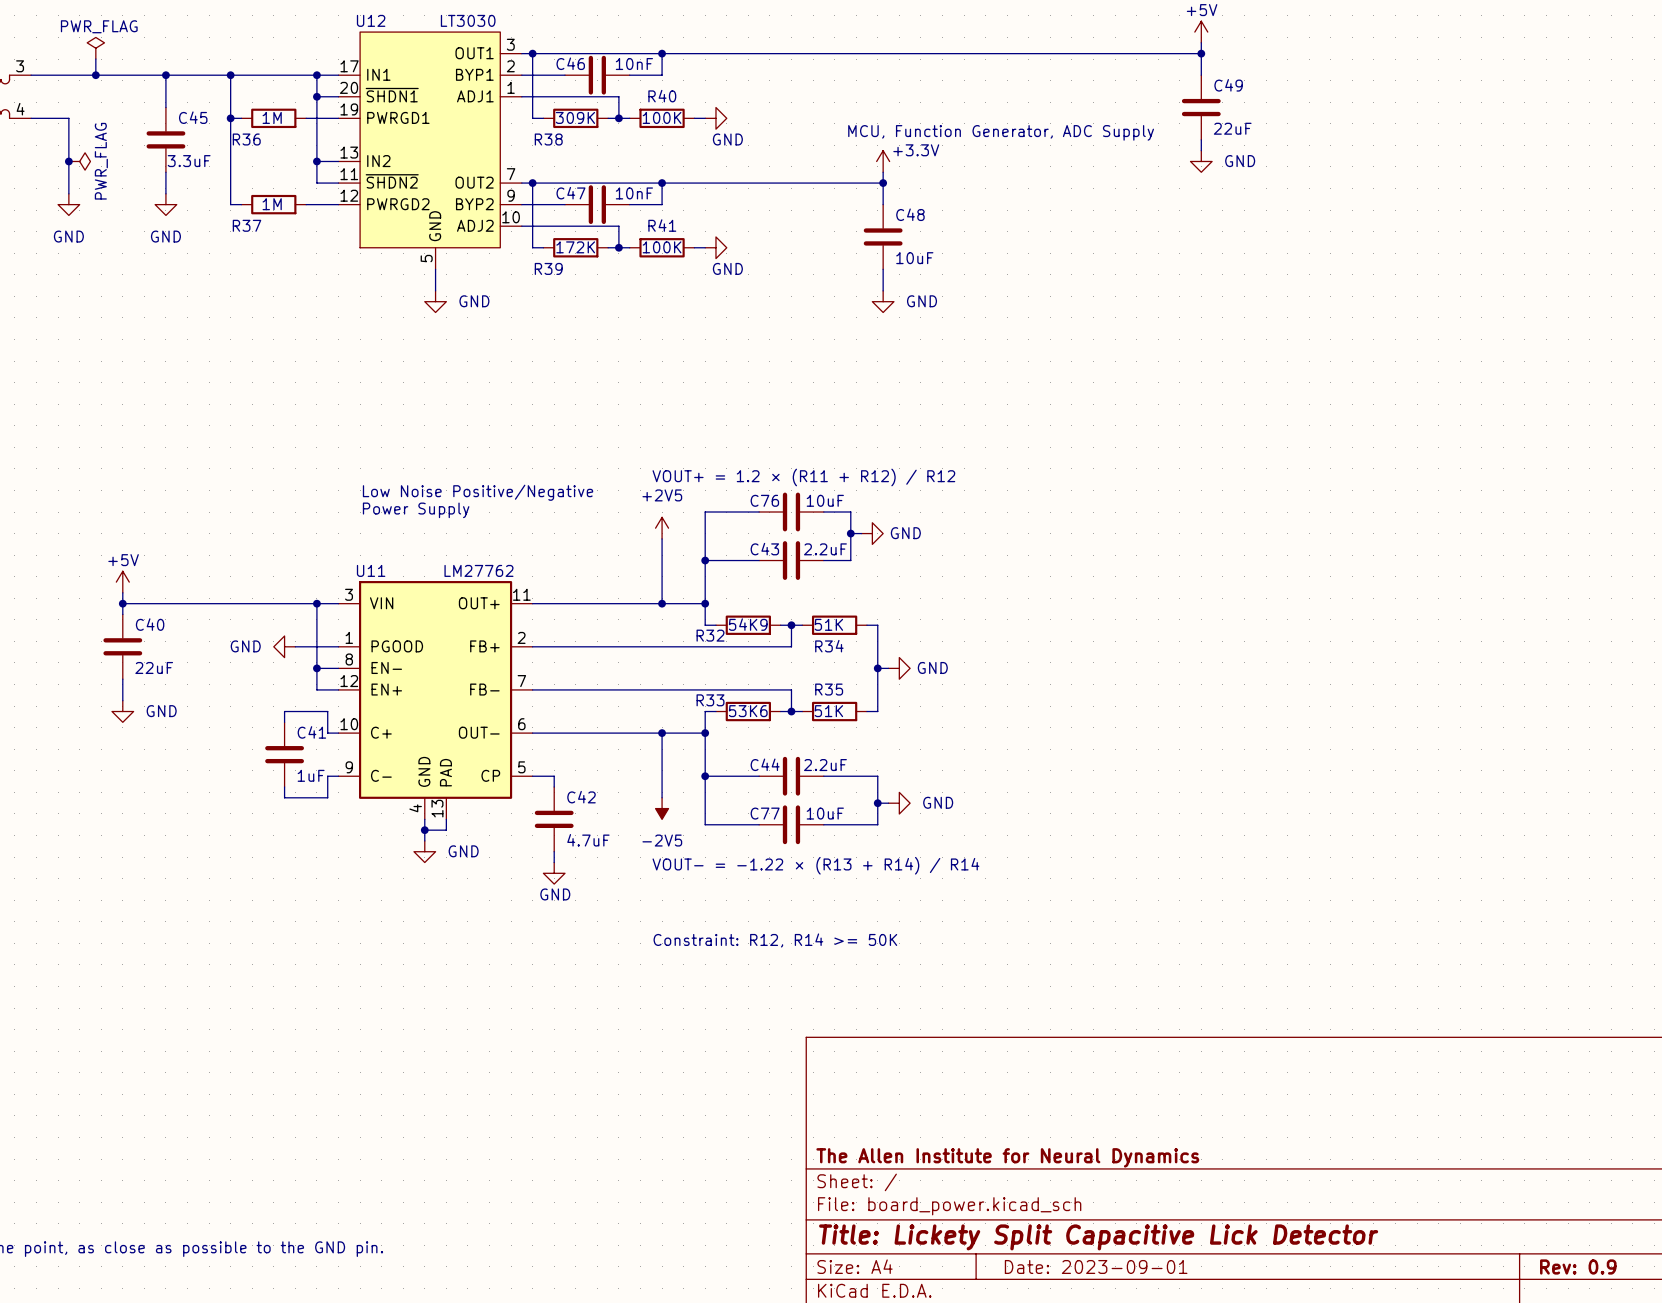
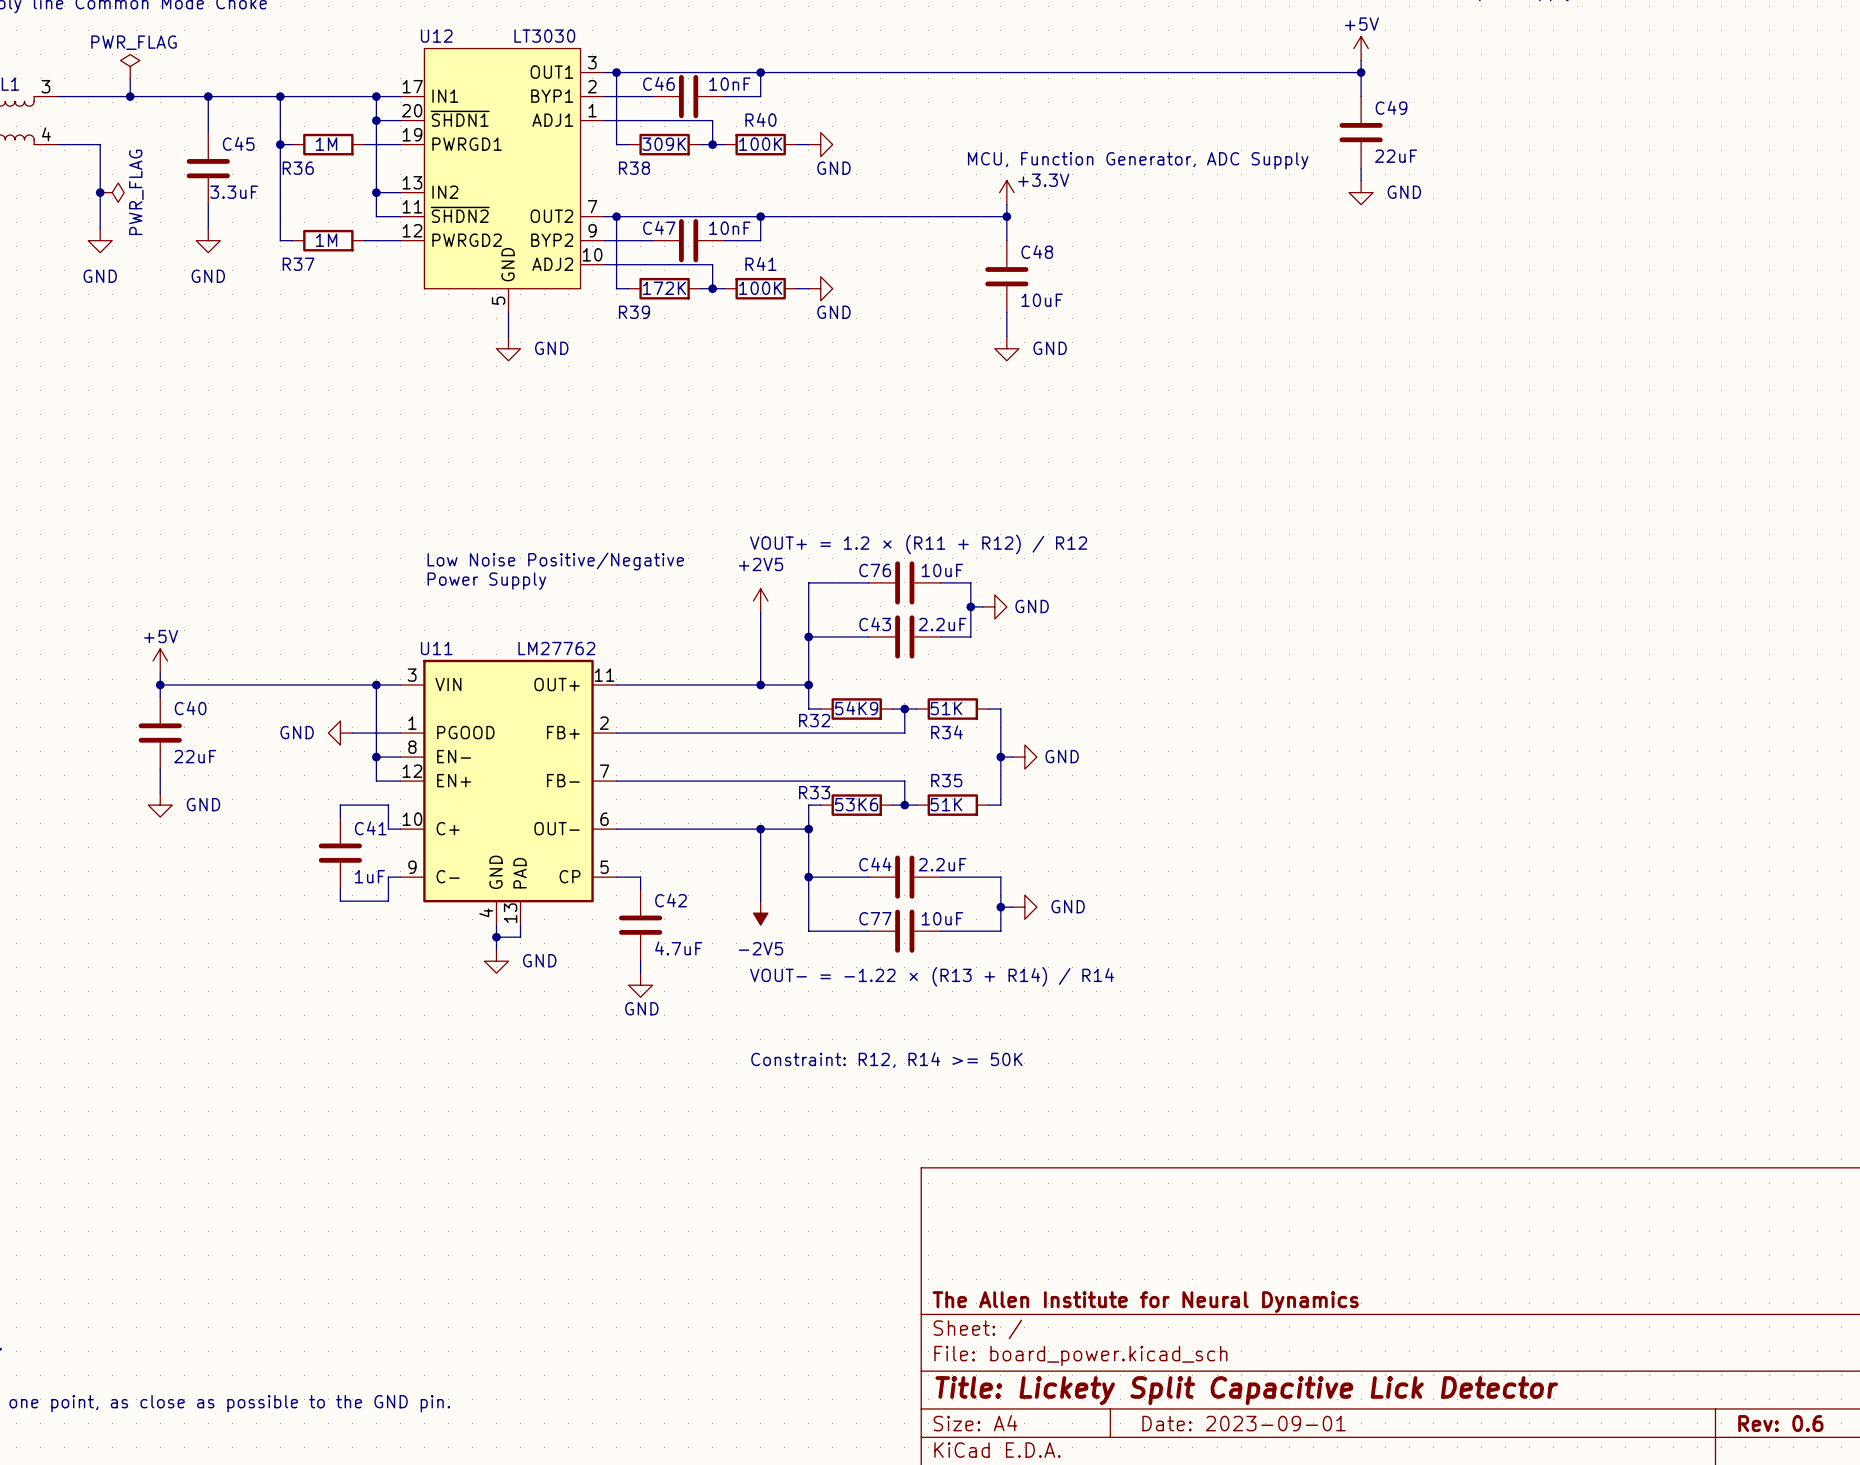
title block: Rev: 0.9 (1578, 1266) -> Rev: 0.6 (1780, 1423)

